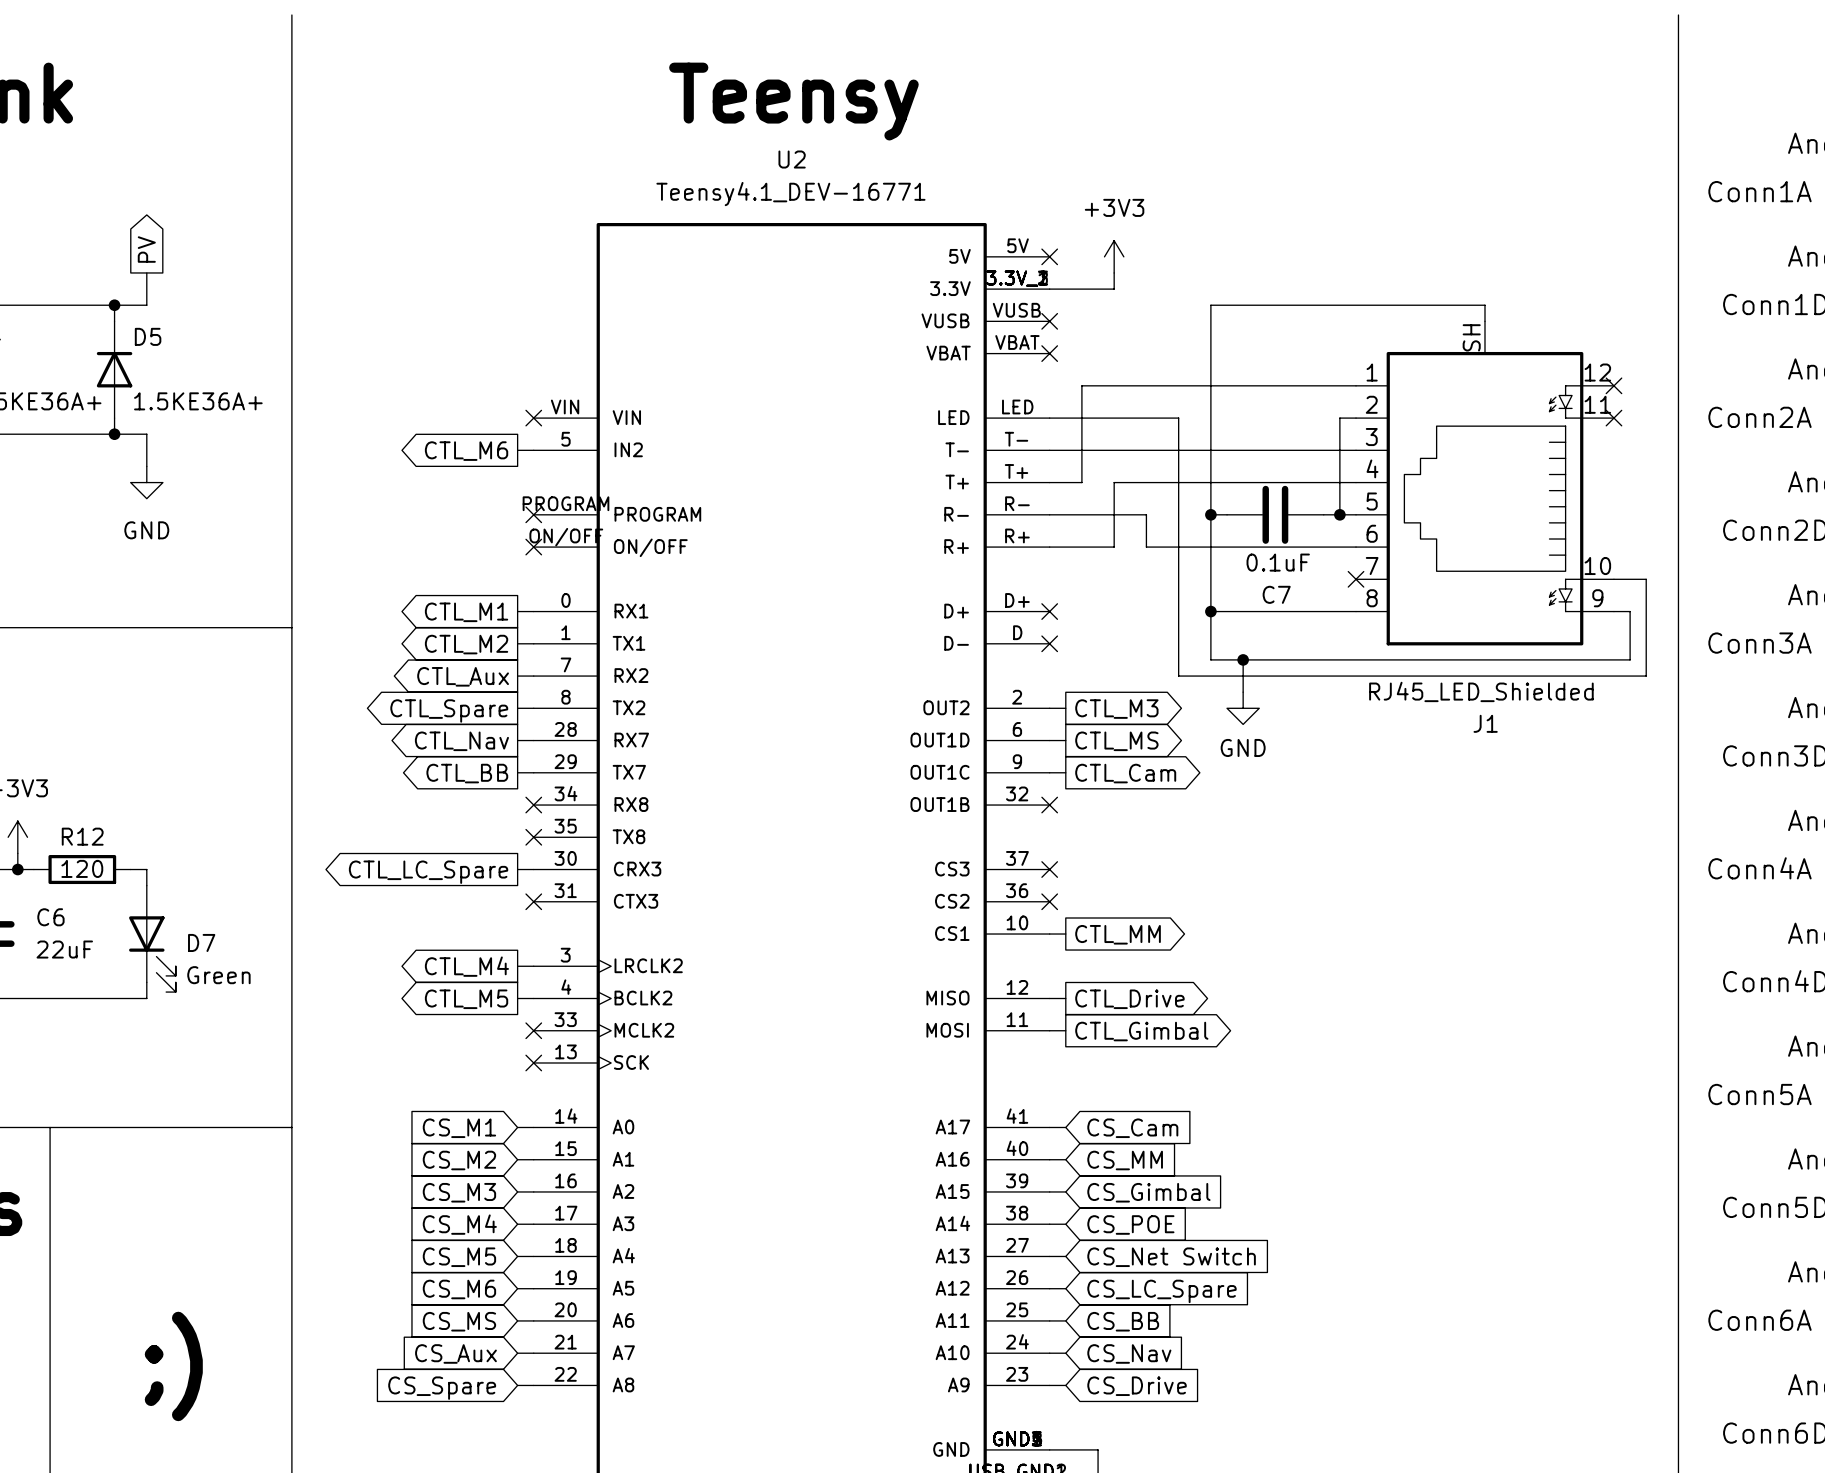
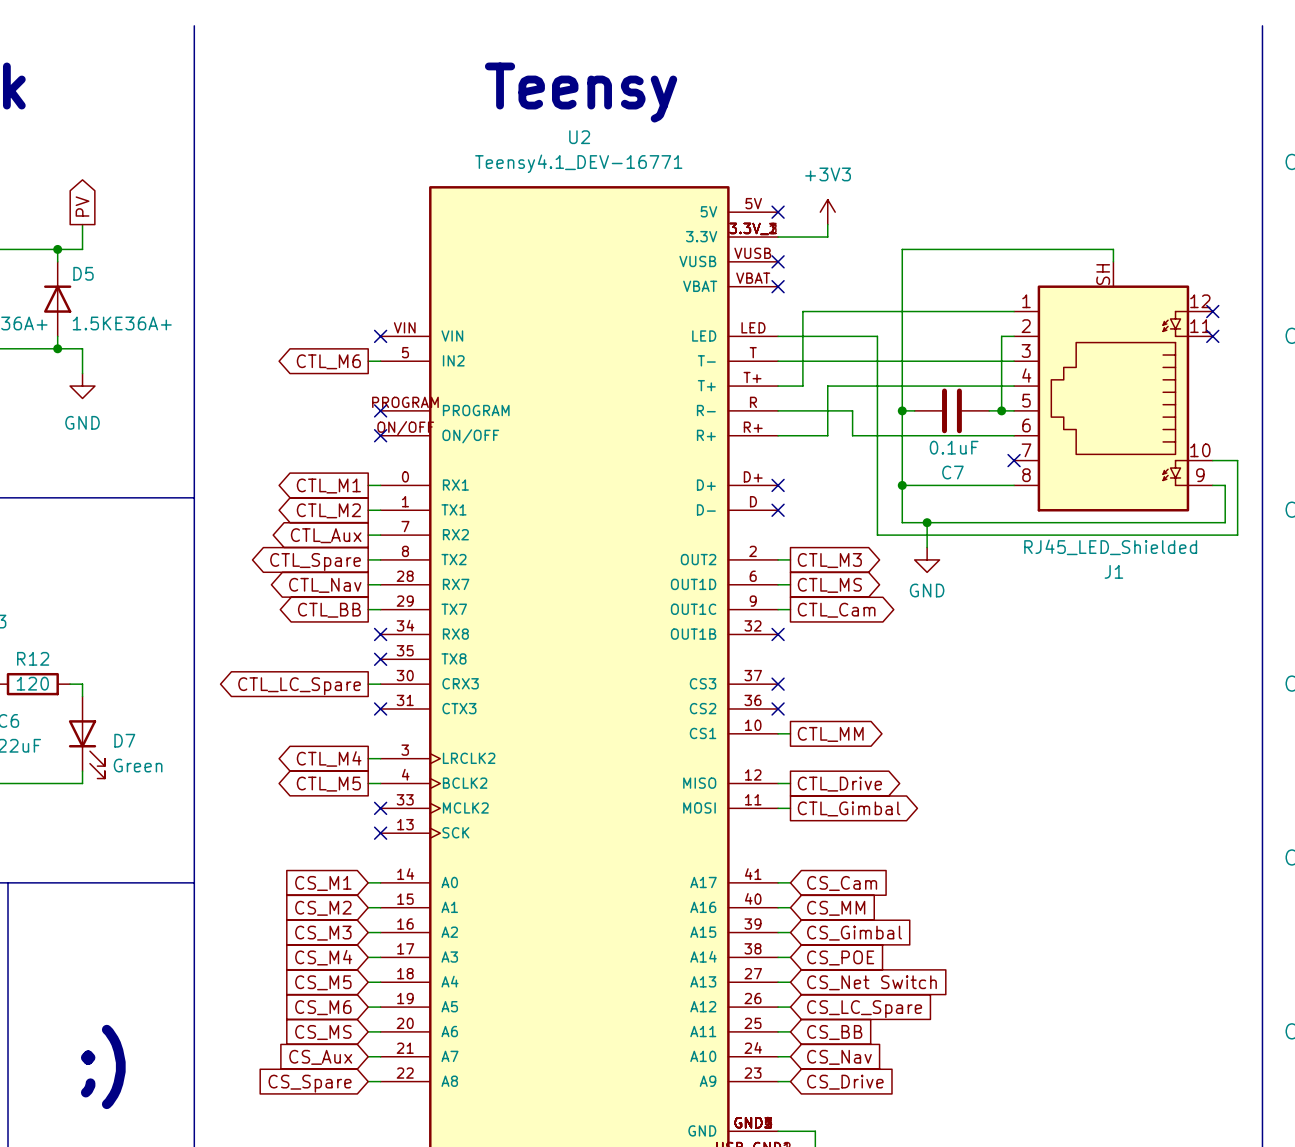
U2 pin number: T- (1016, 439) -> T (753, 352)
U2 pin number: R- (1017, 503) -> R (753, 402)

